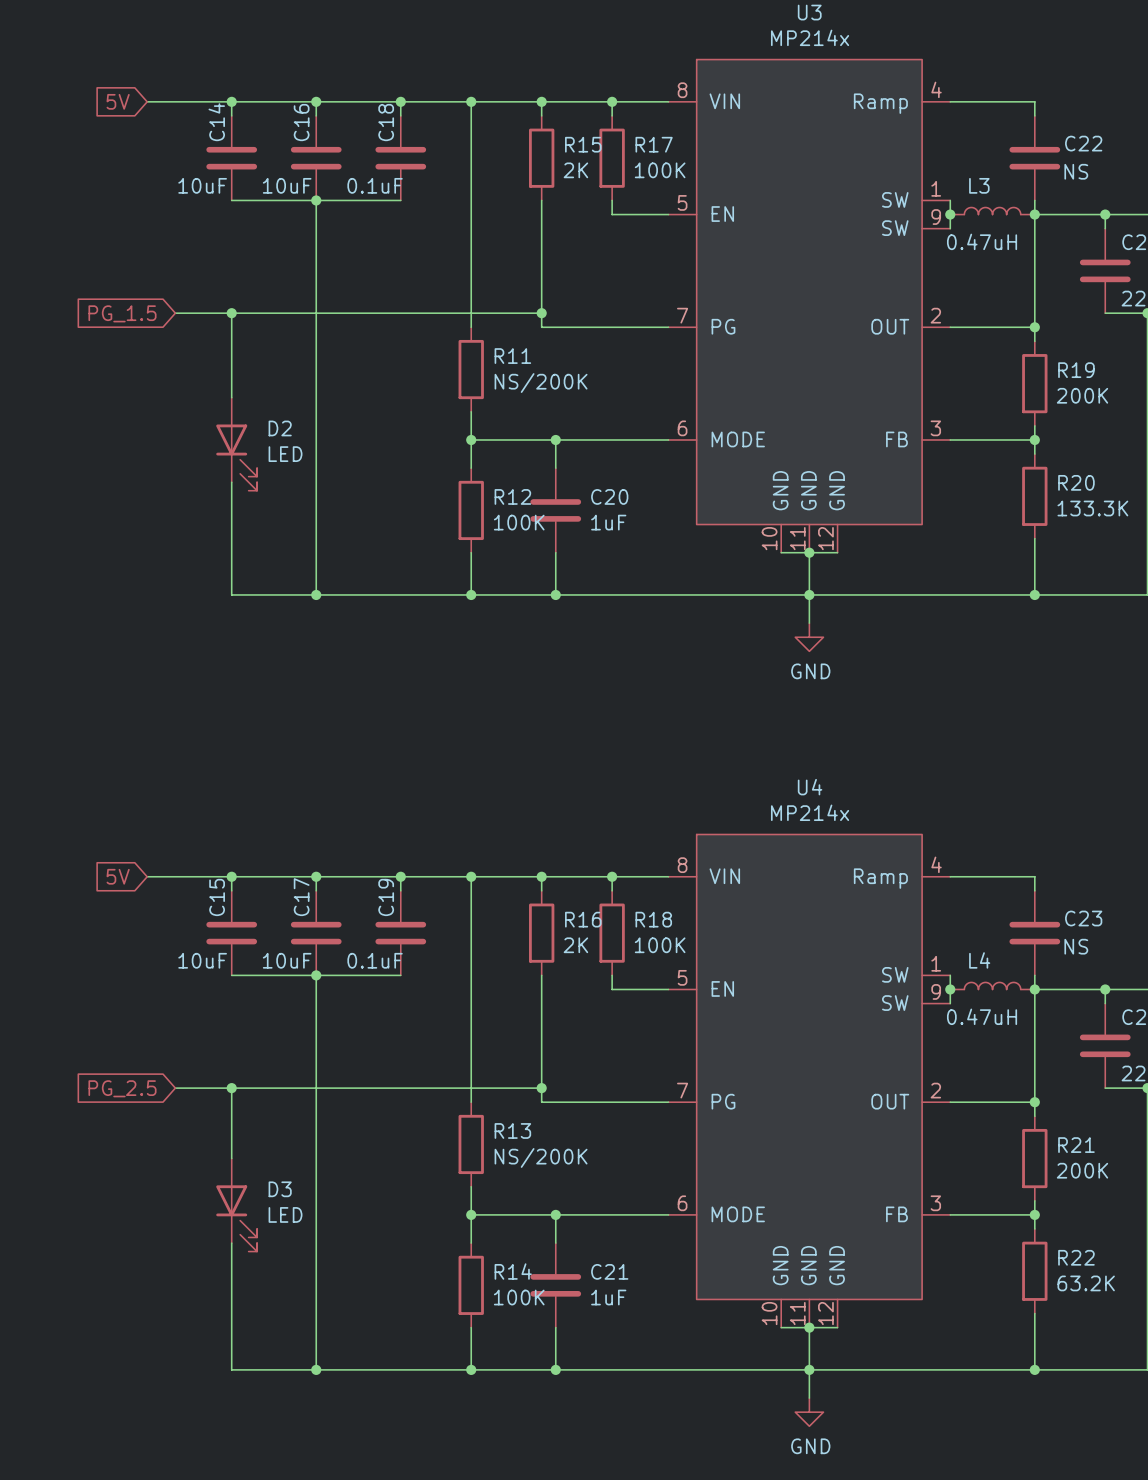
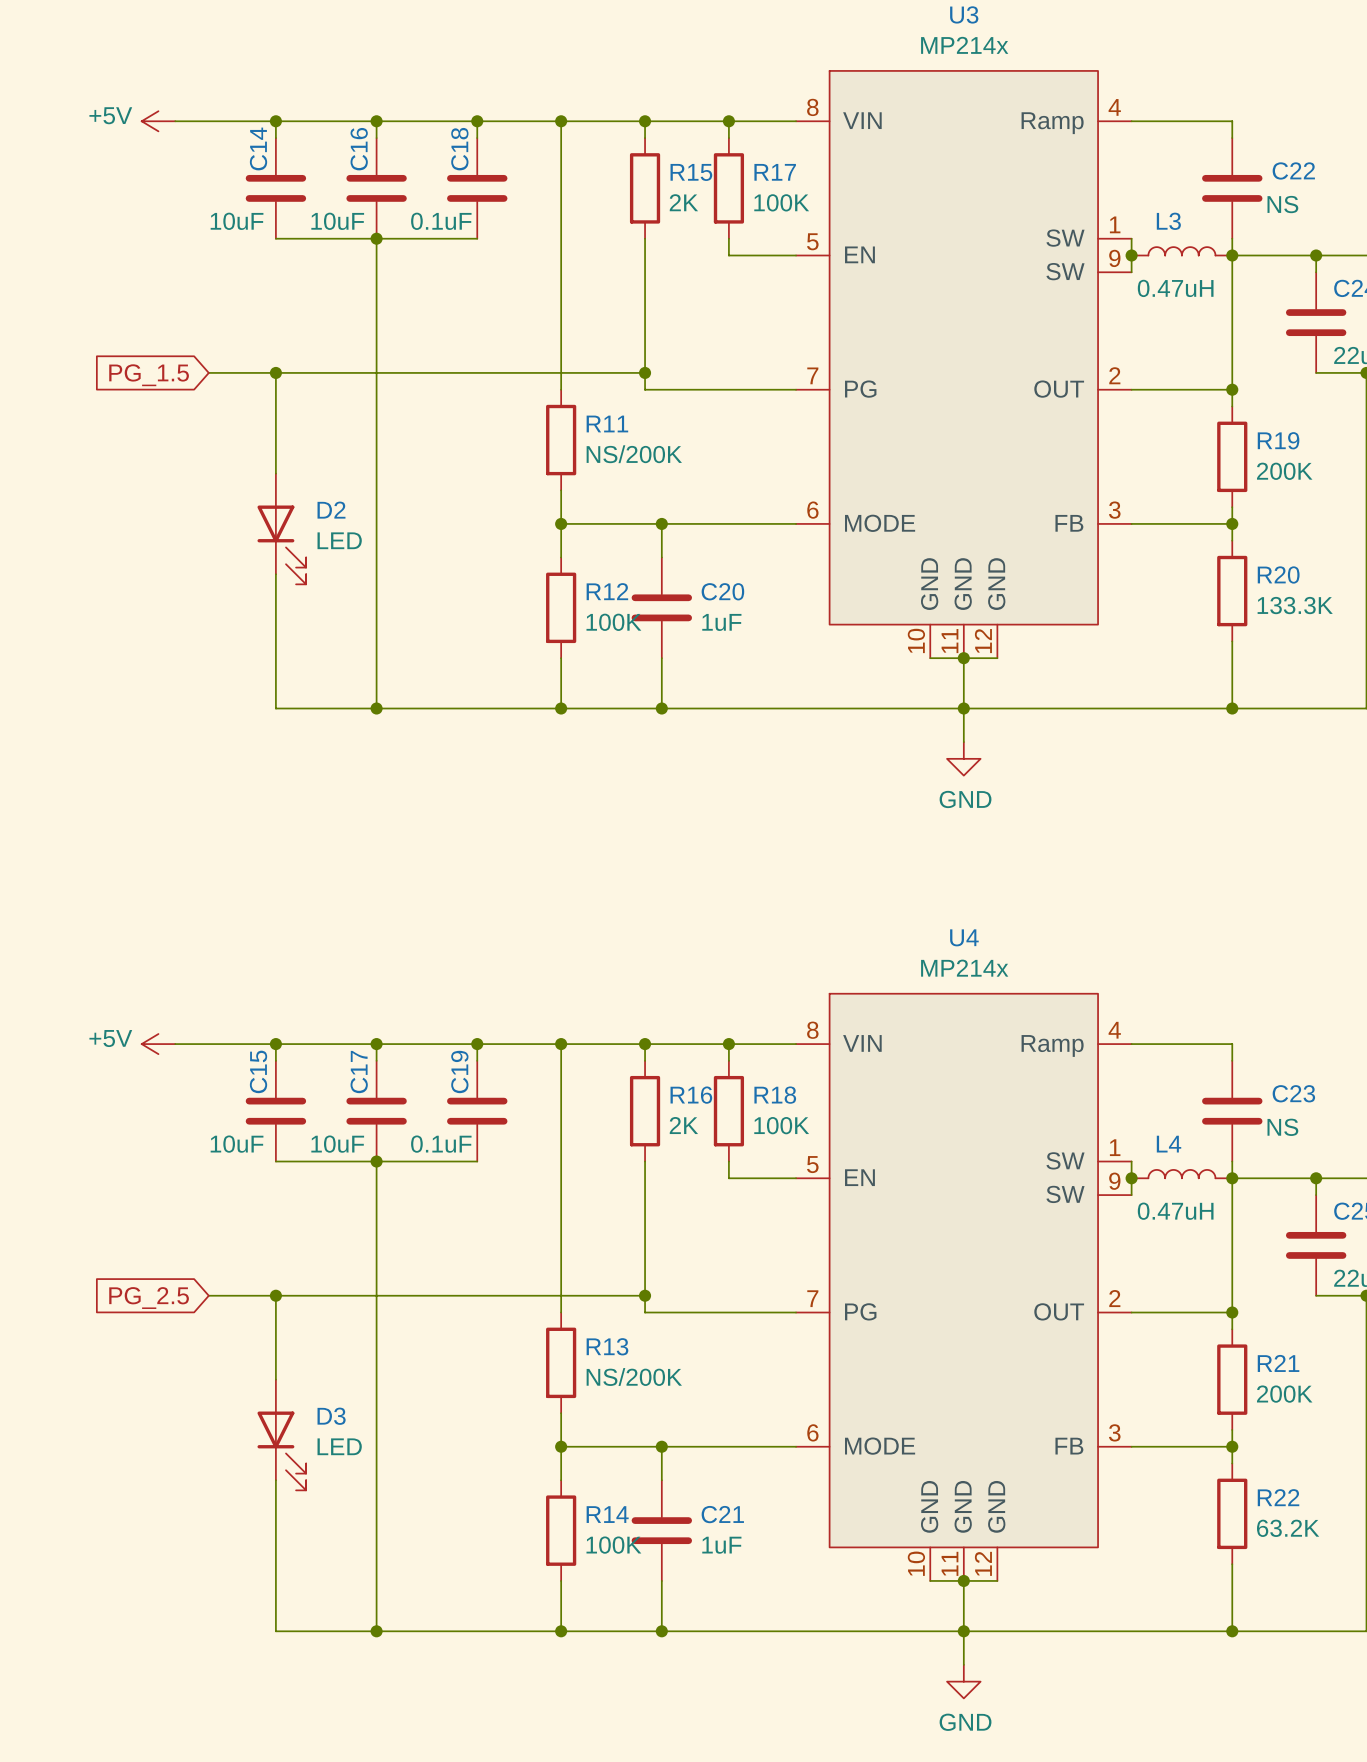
global label: 5V (118, 101) -> none
power symbol: none -> +5V (158, 121)
global label: 5V (118, 876) -> none
power symbol: none -> +5V (158, 1044)

